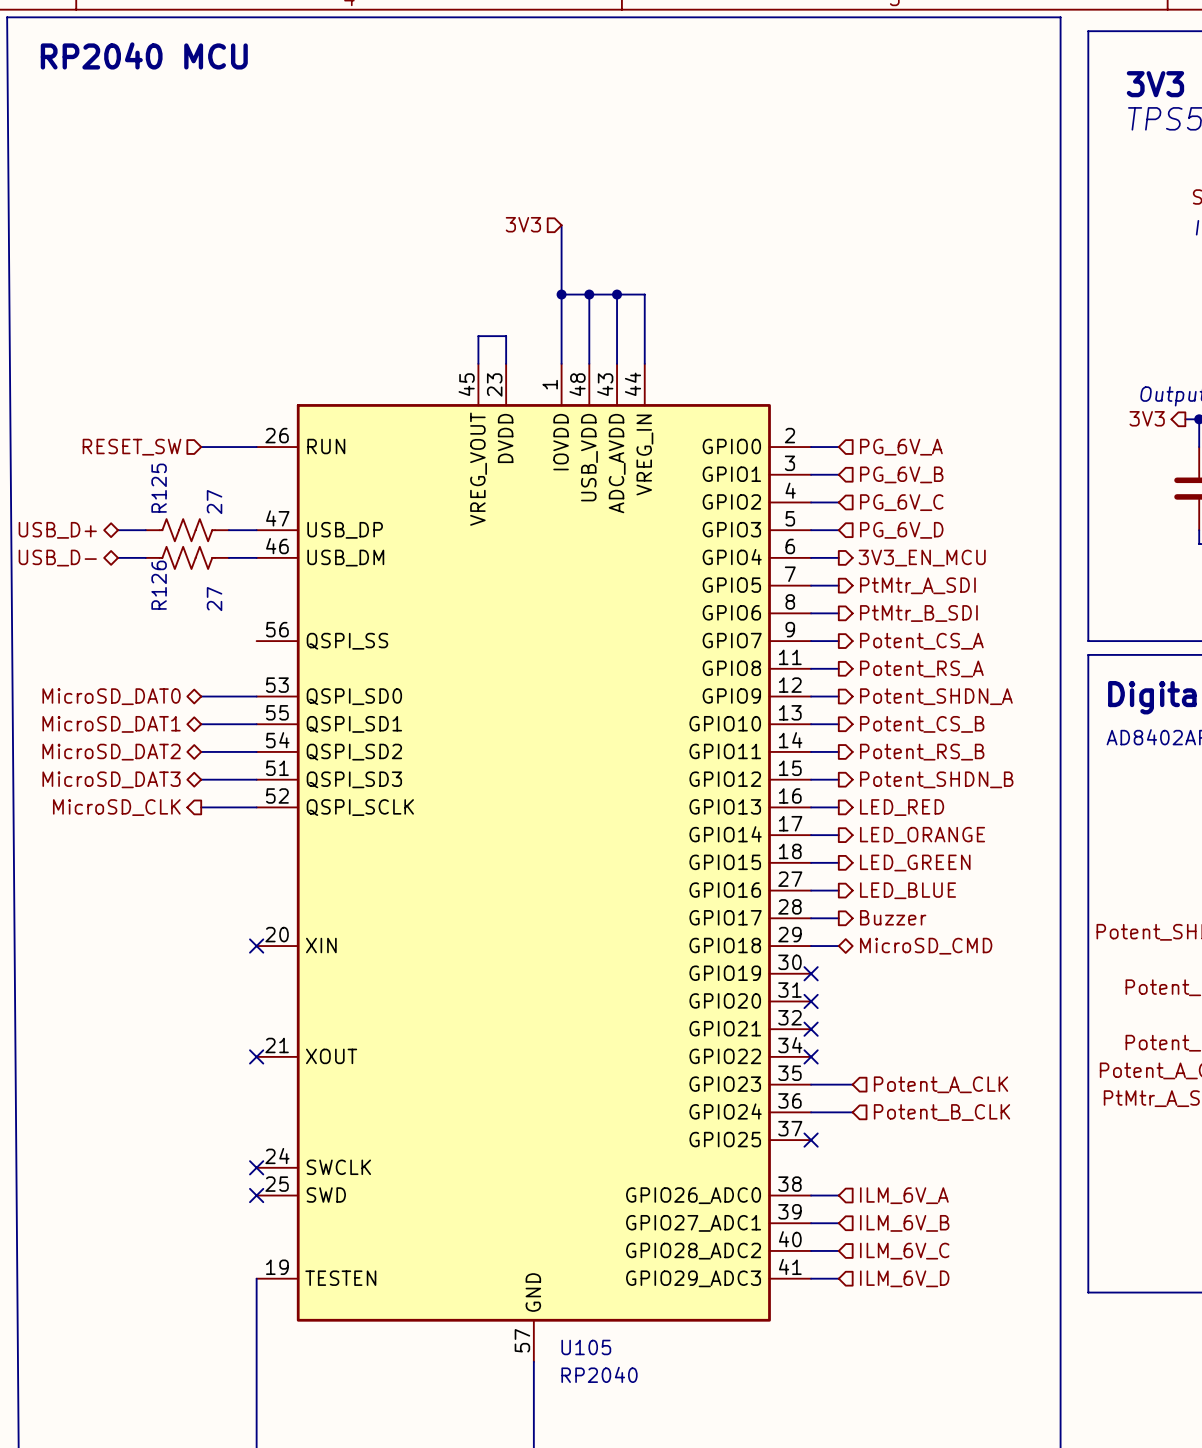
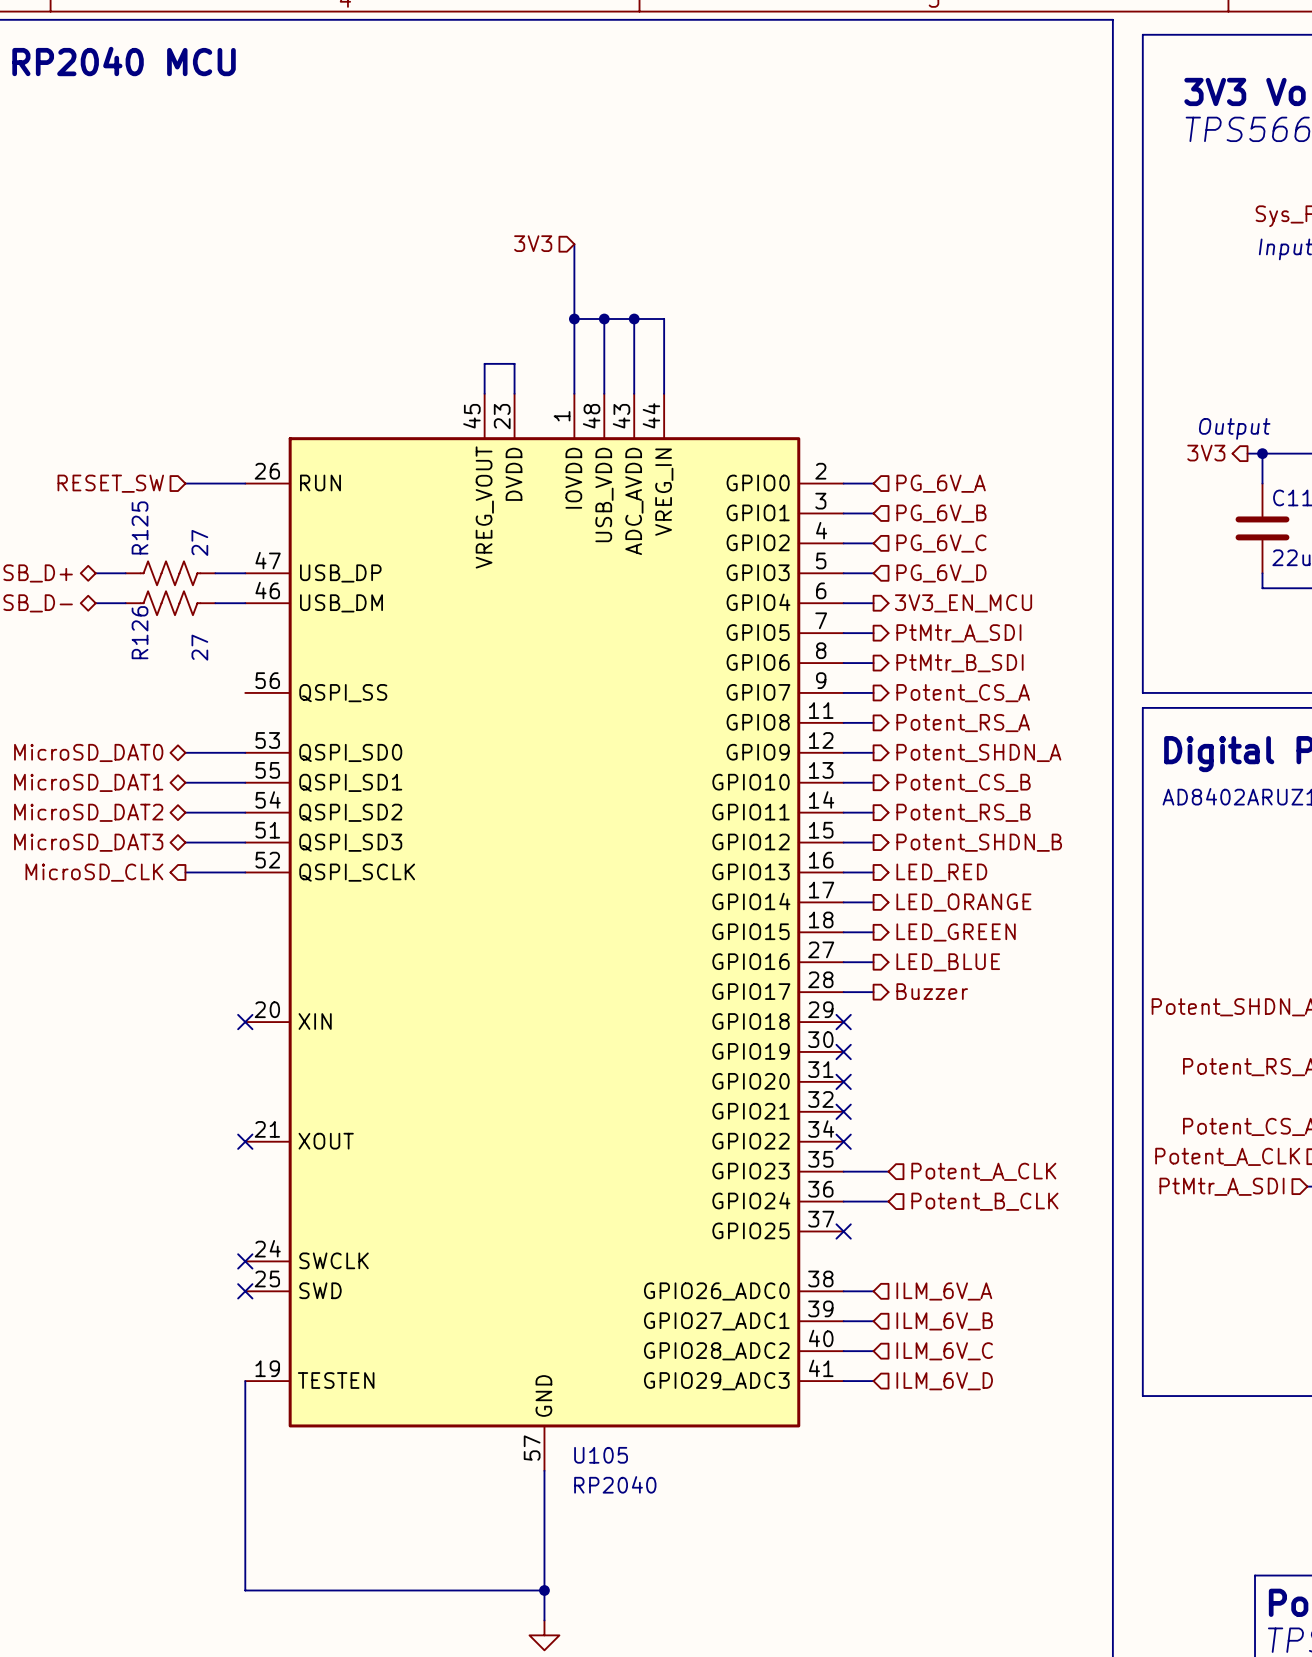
wire: (811, 946) (838, 946) -> none
no-connect mark: none -> (843, 1022)
hierarchical label: MicroSD_CMD (926, 946) -> none

